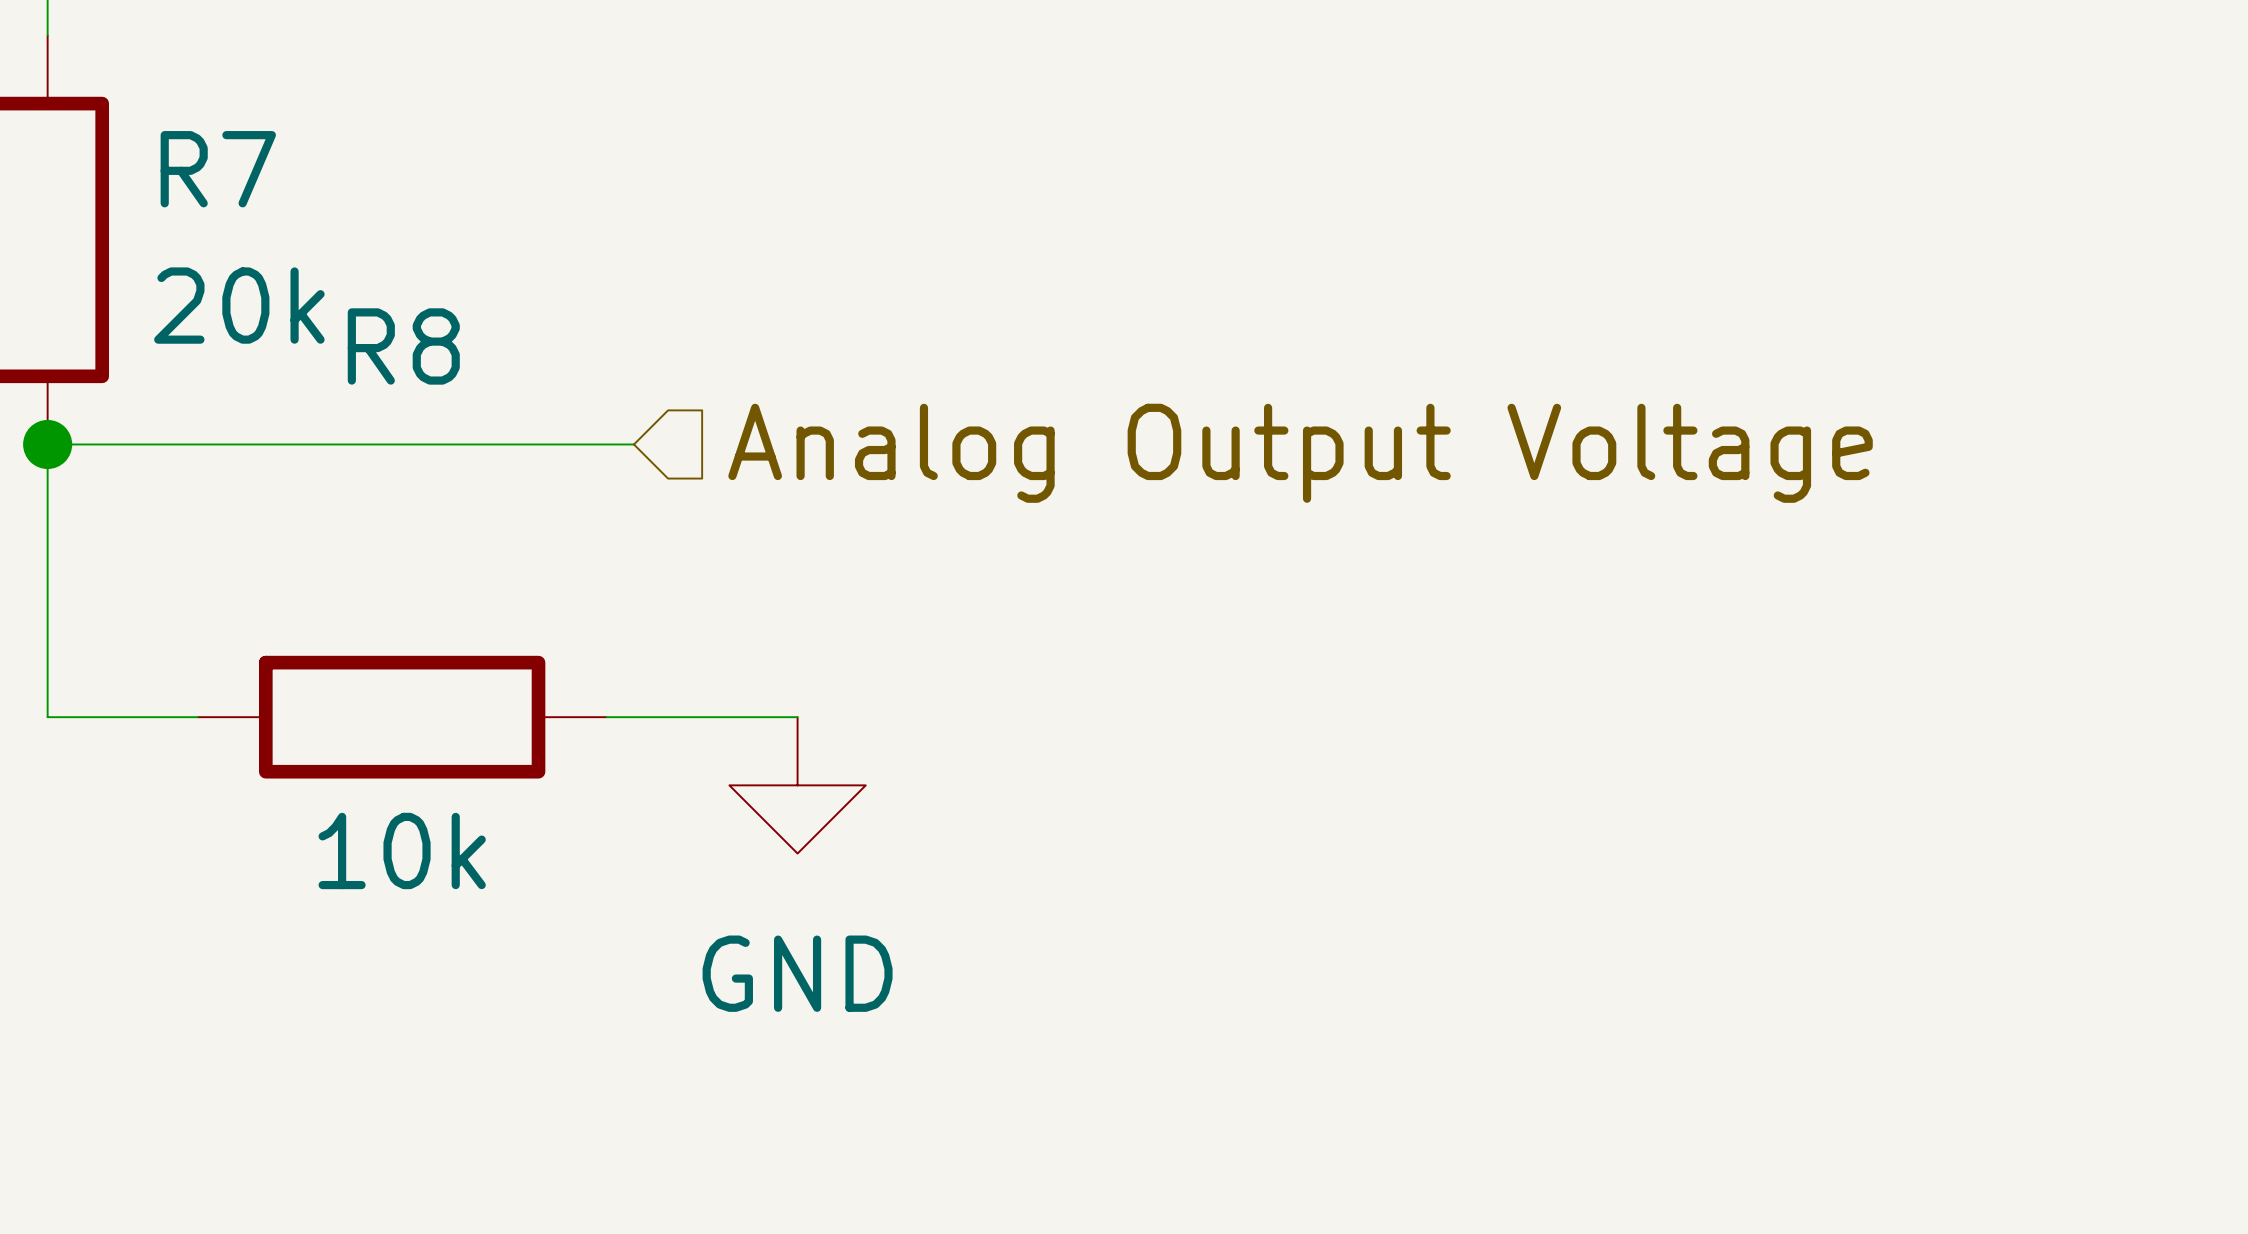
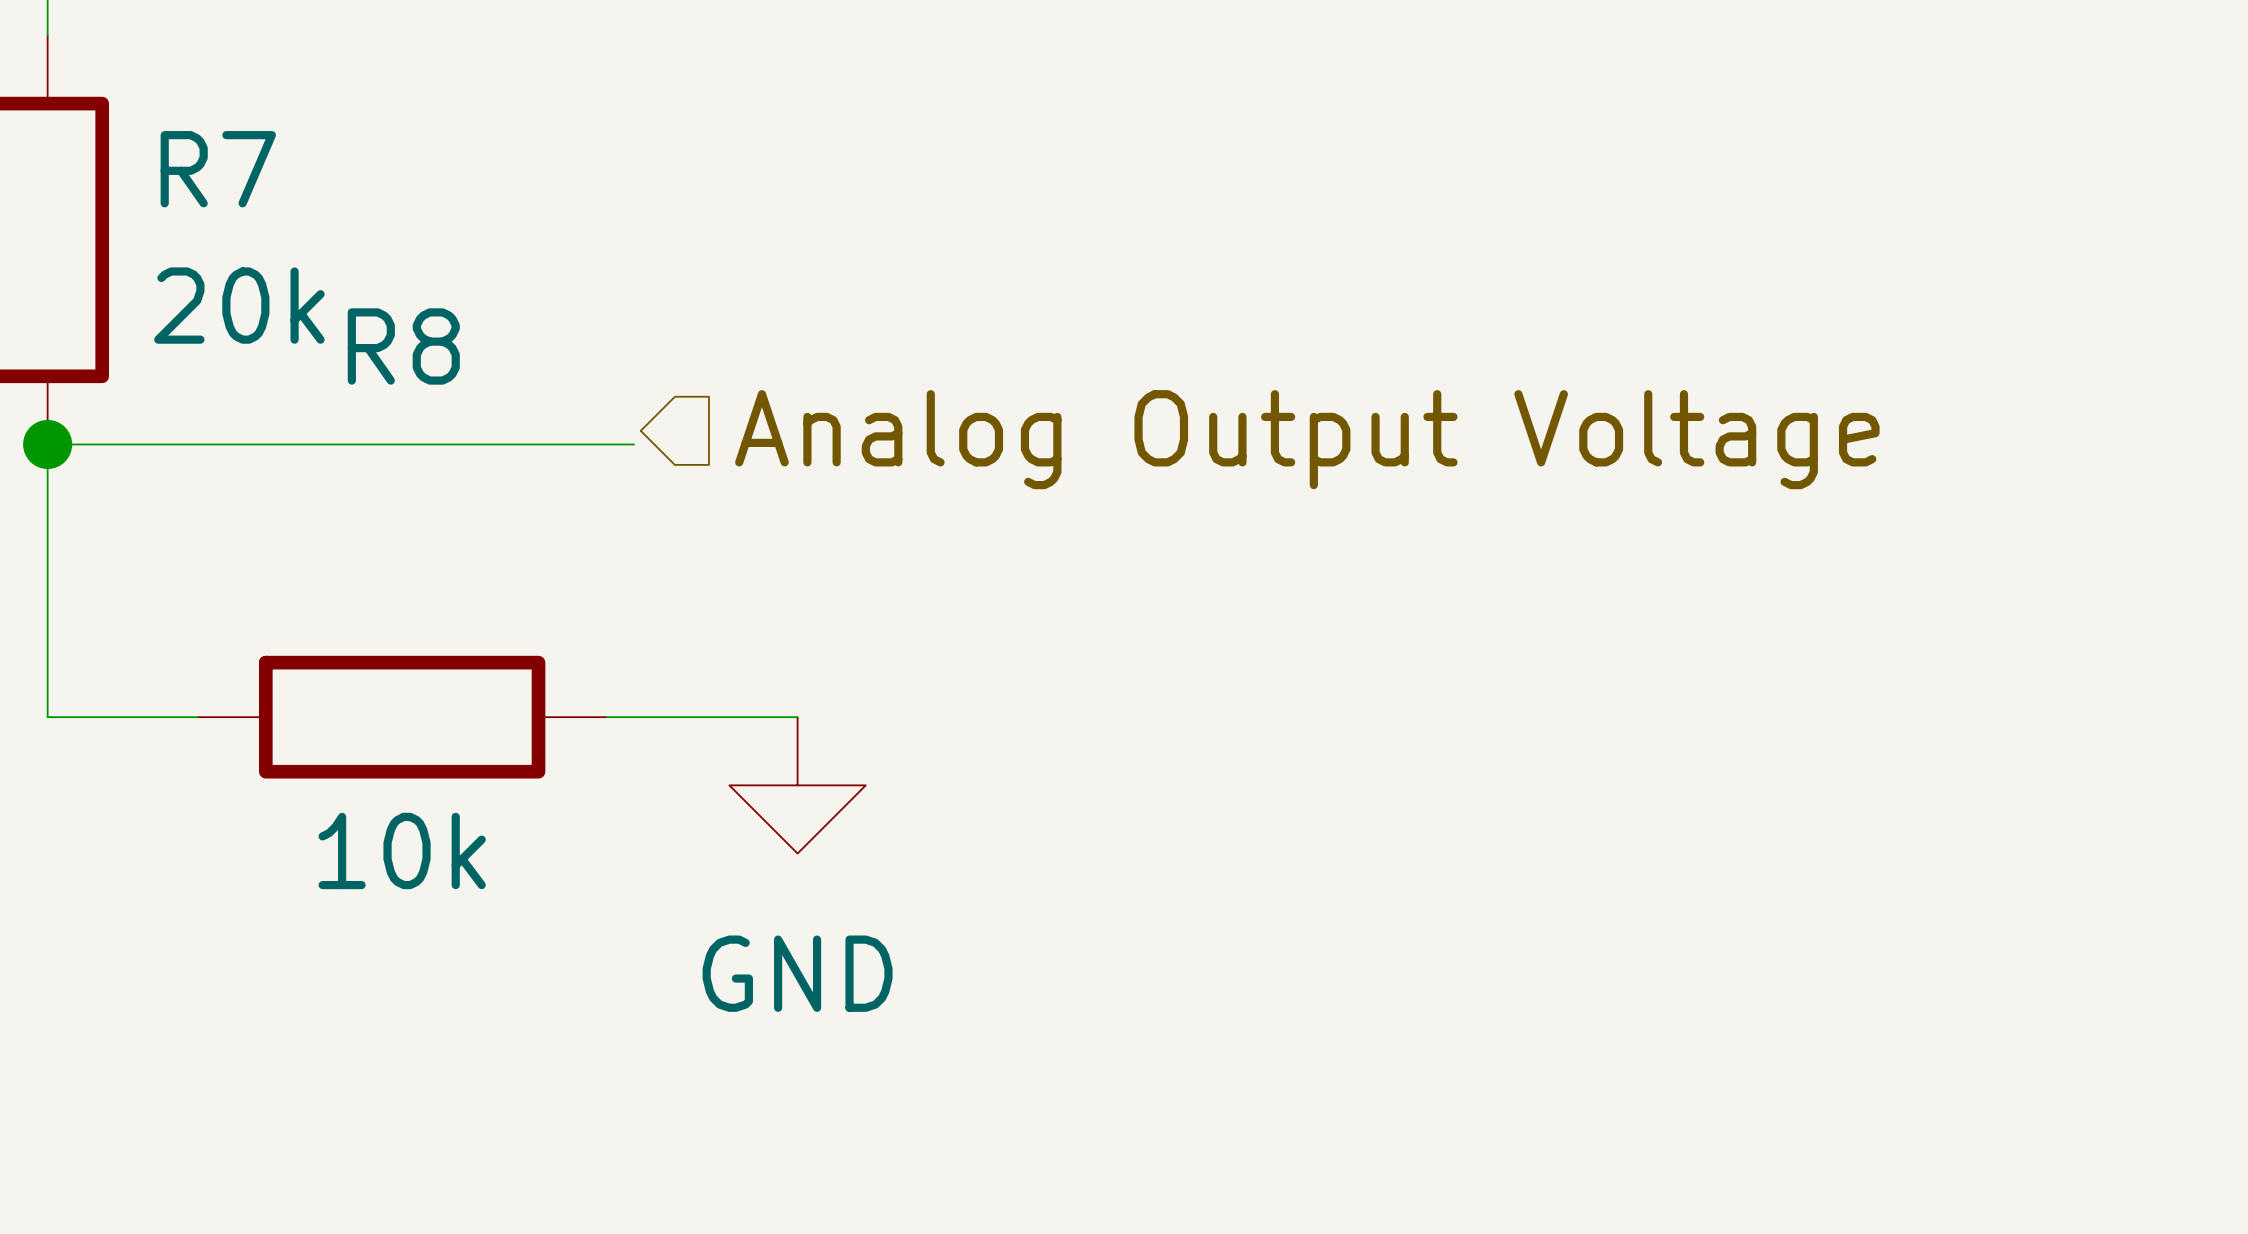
hierarchical label position: Analog Output Voltage (1300, 453) -> Analog Output Voltage (1307, 439)

